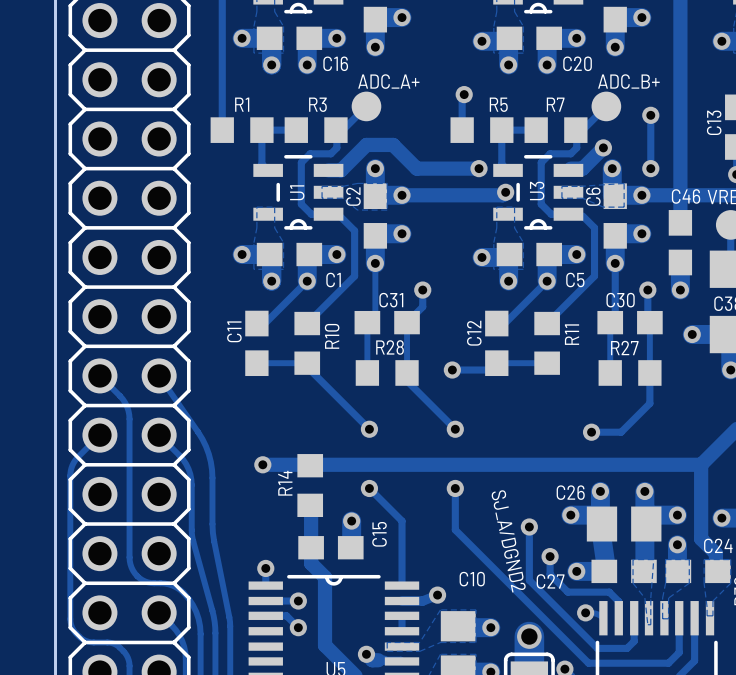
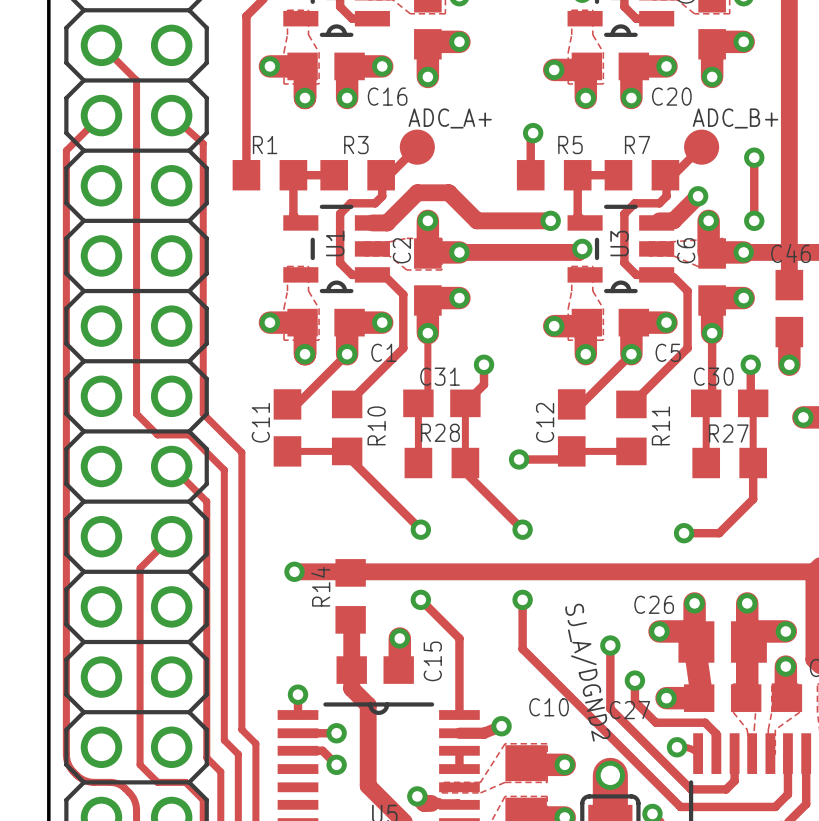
track: none -> (101, 45) (136, 80) (136, 413) (157, 434) (189, 434) (224, 470) (224, 740) (238, 754) (238, 771)
track: none -> (171, 115) (203, 143) (203, 413) (241, 452) (241, 729) (255, 743) (255, 763)
track: (99, 375) (122, 399) (129, 414) (129, 557) (131, 567) (137, 576) (145, 581) (168, 584) (183, 592) (196, 611) (200, 634) -> none
track: (159, 375) (198, 432) (208, 454) (212, 469) (212, 532) (230, 626) -> (171, 466) (206, 501) (206, 757) (220, 771)
track: (99, 435) (74, 461) (70, 475) -> (101, 115) (66, 150) (66, 584)
track: (159, 435) (183, 459) (190, 474) (192, 535) (213, 616) (215, 633) -> (171, 536) (140, 568) (140, 764) (157, 782) (185, 782) (203, 802)
track: (159, 612) (179, 635) (184, 646) (185, 659) -> none

